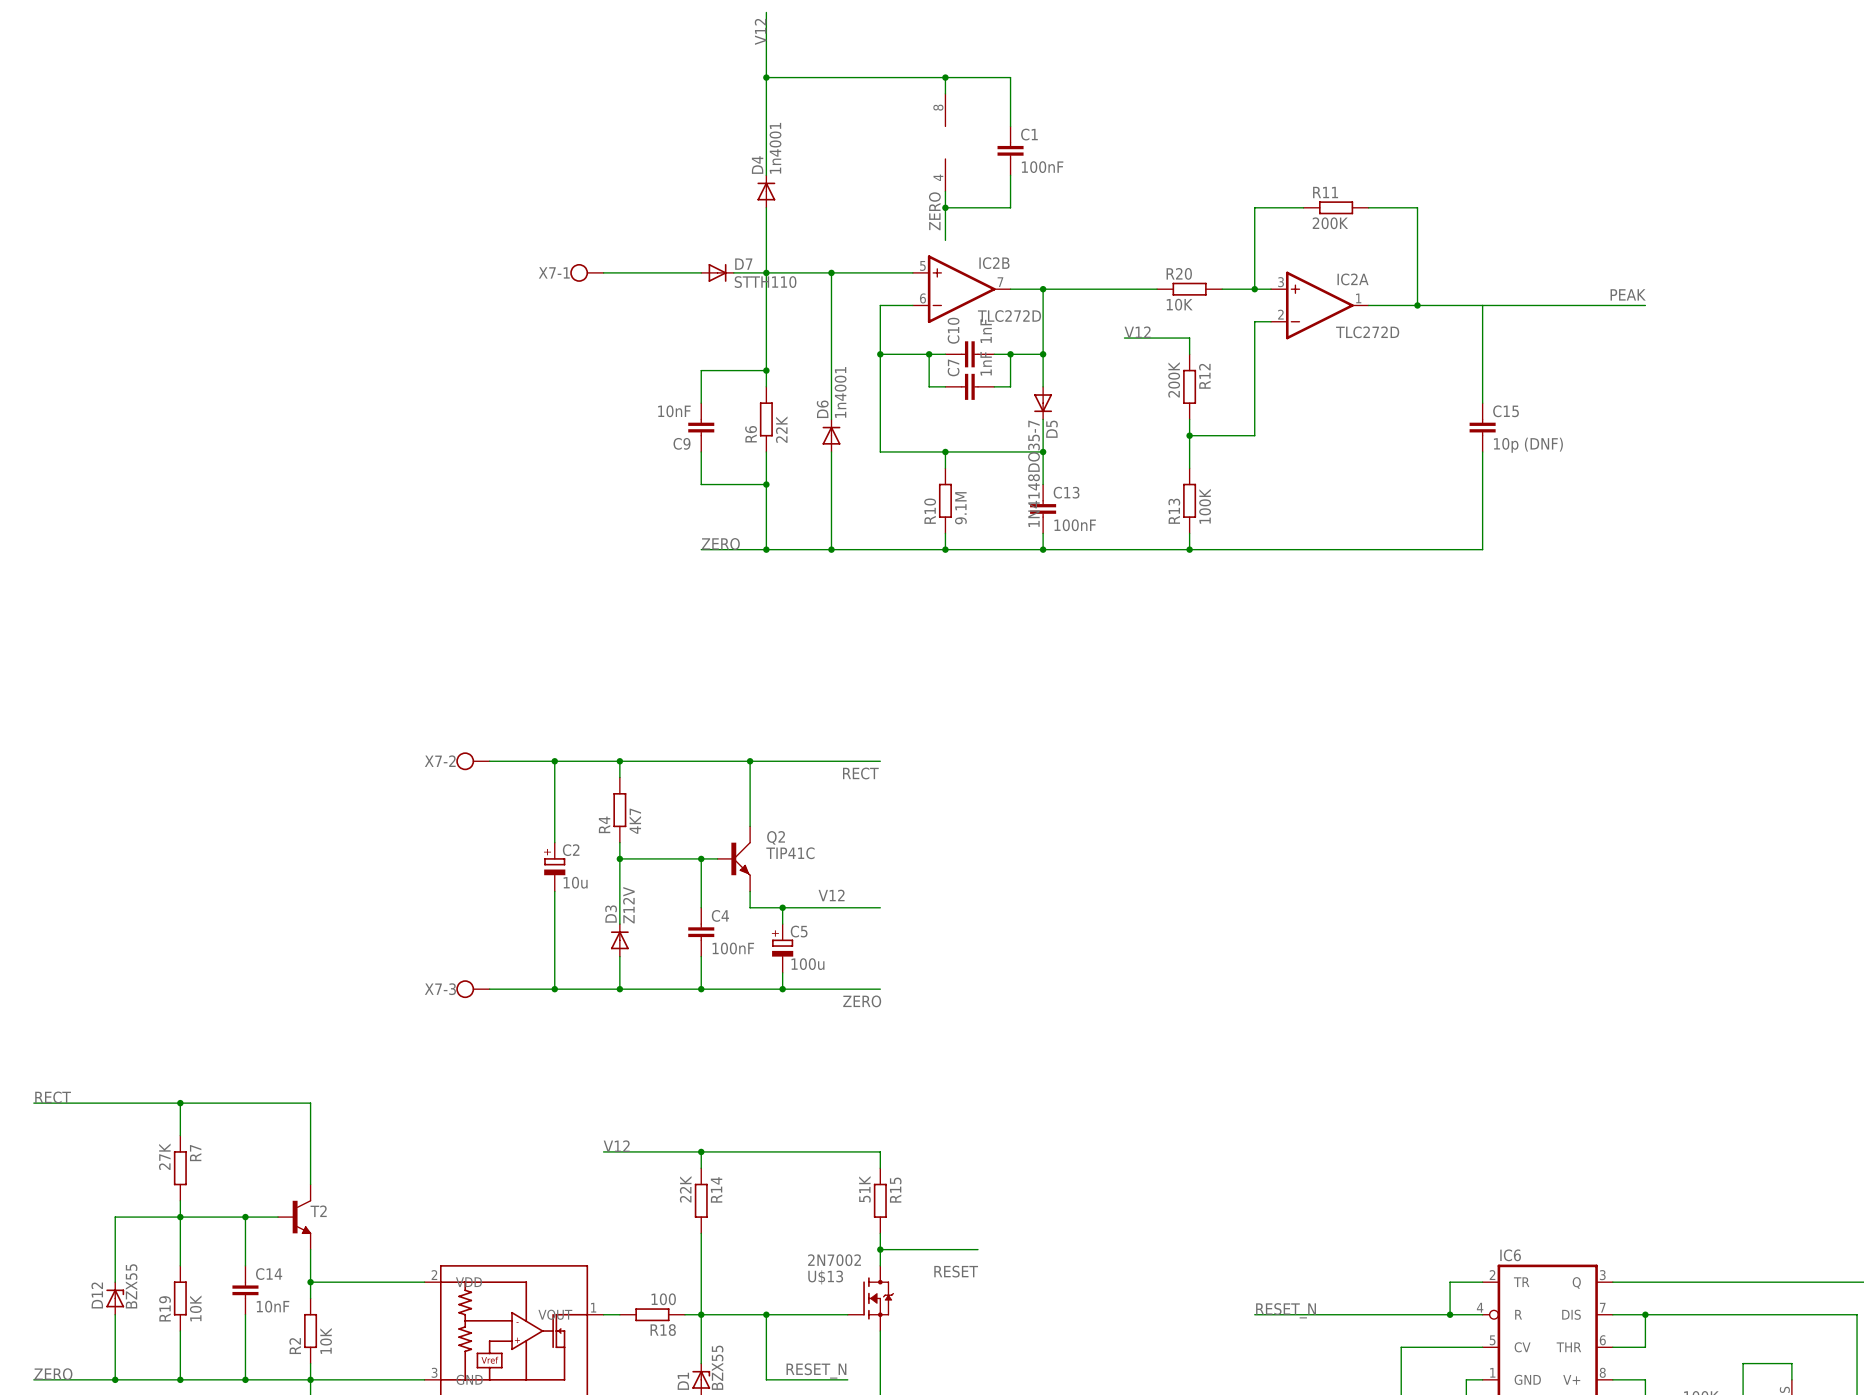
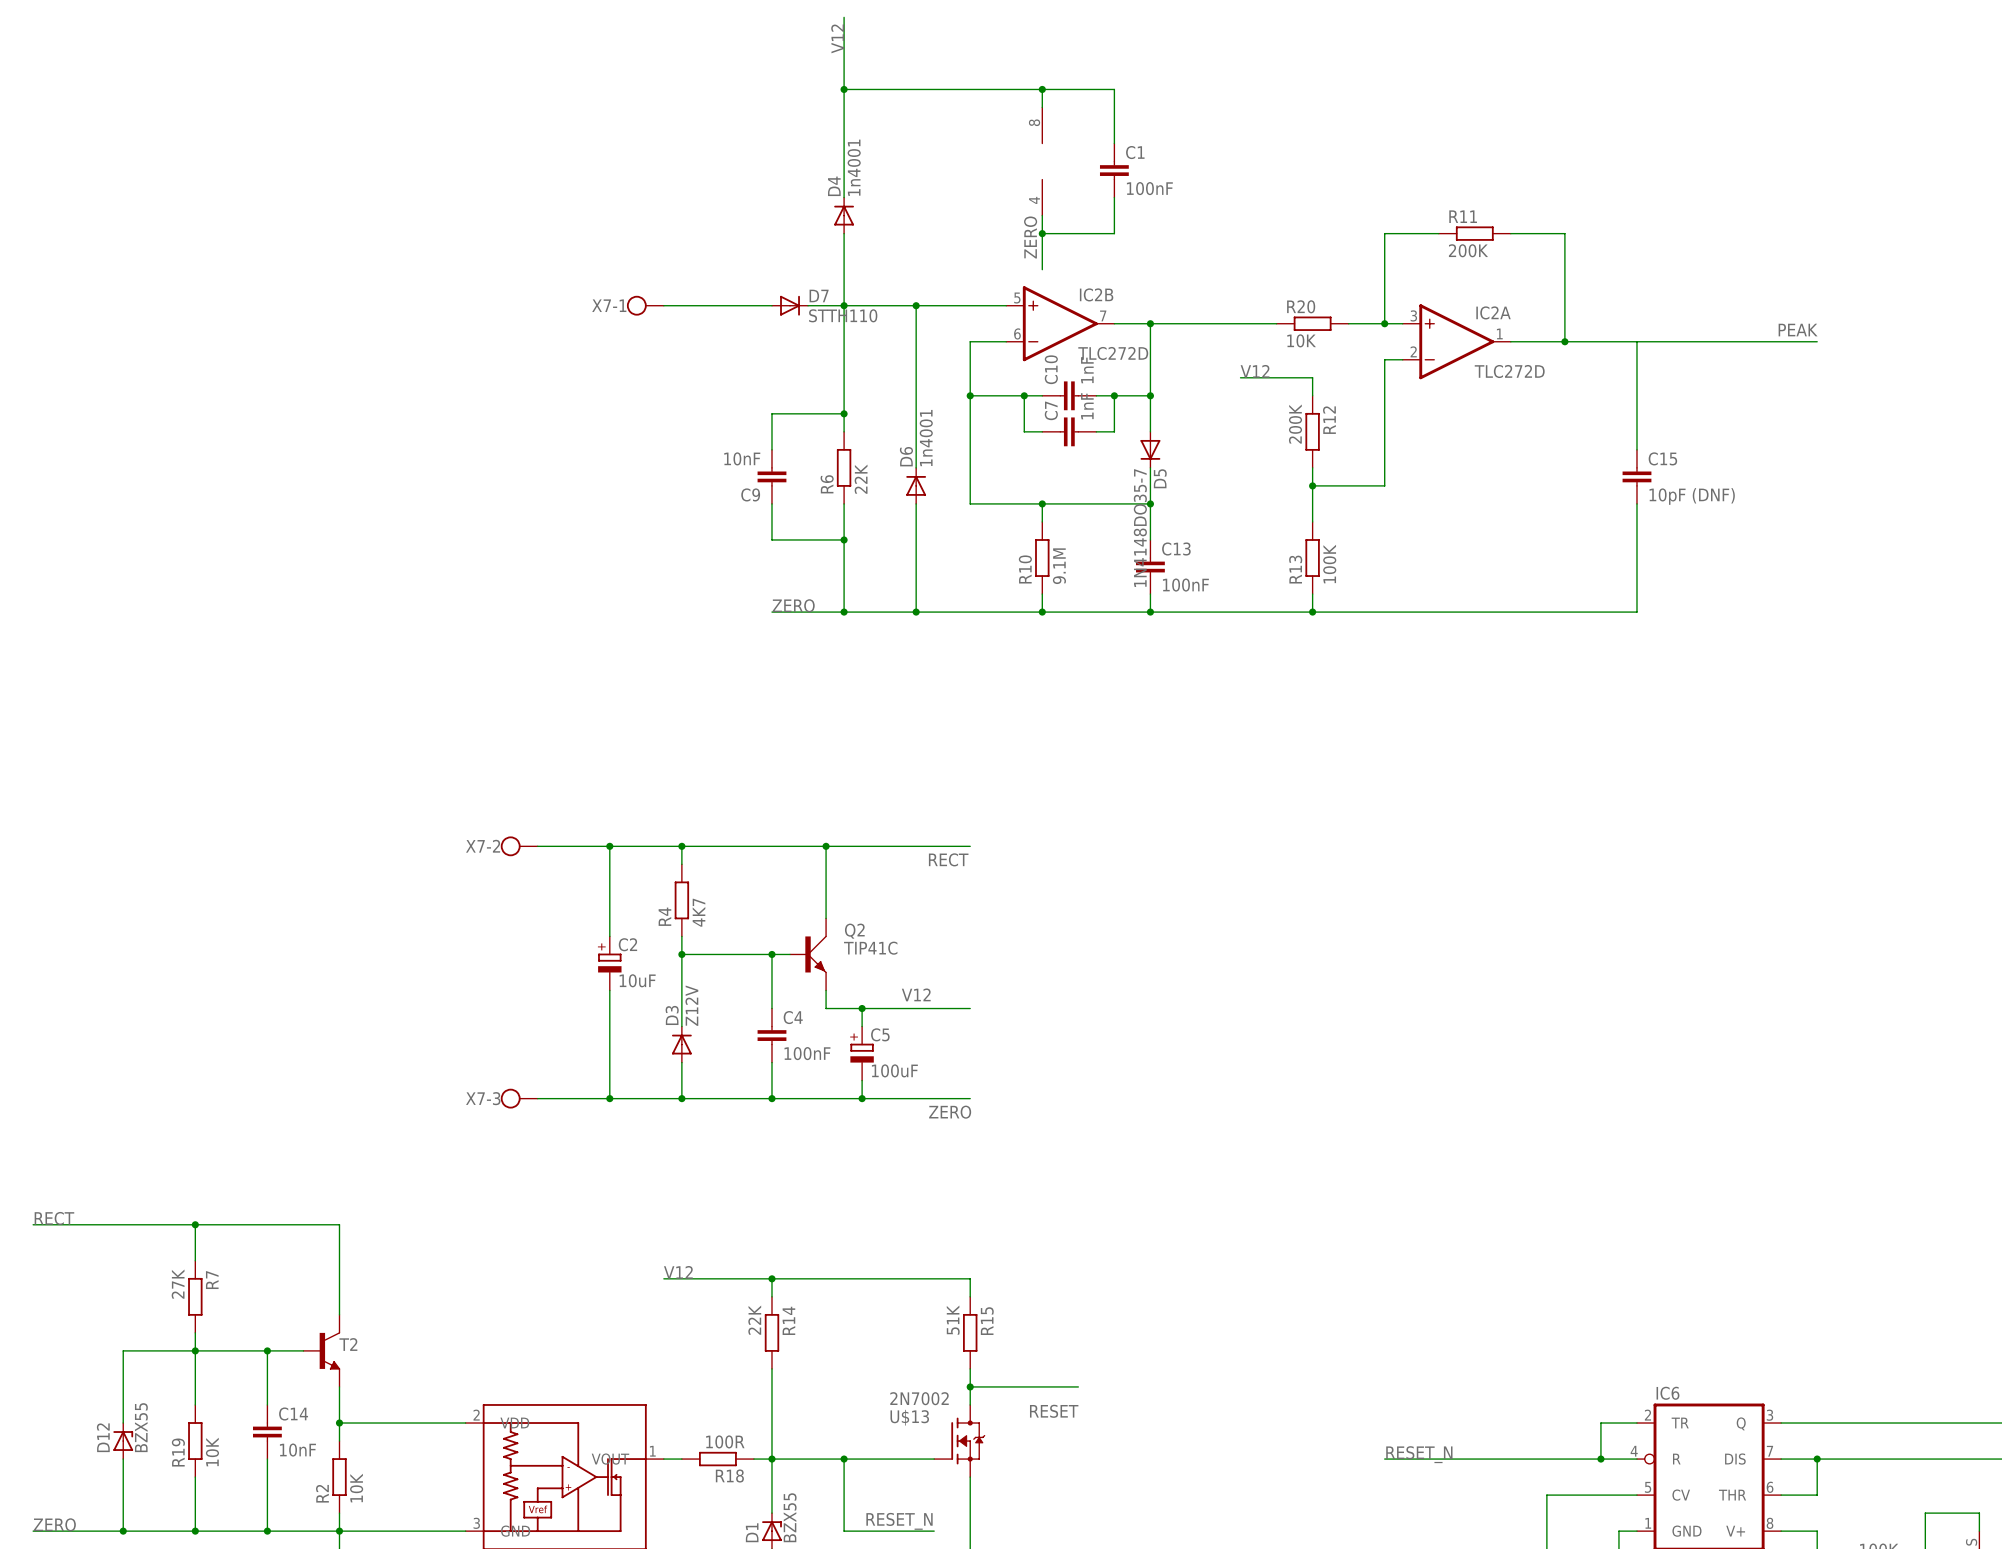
C15 value: 10p (DNF) (1528, 445) -> 10pF (DNF) (1692, 496)
C2 value: 10u (575, 882) -> 10uF (637, 980)
C5 value: 100u (807, 964) -> 100uF (894, 1070)
R18 value: 100 (663, 1299) -> 100R (725, 1441)

